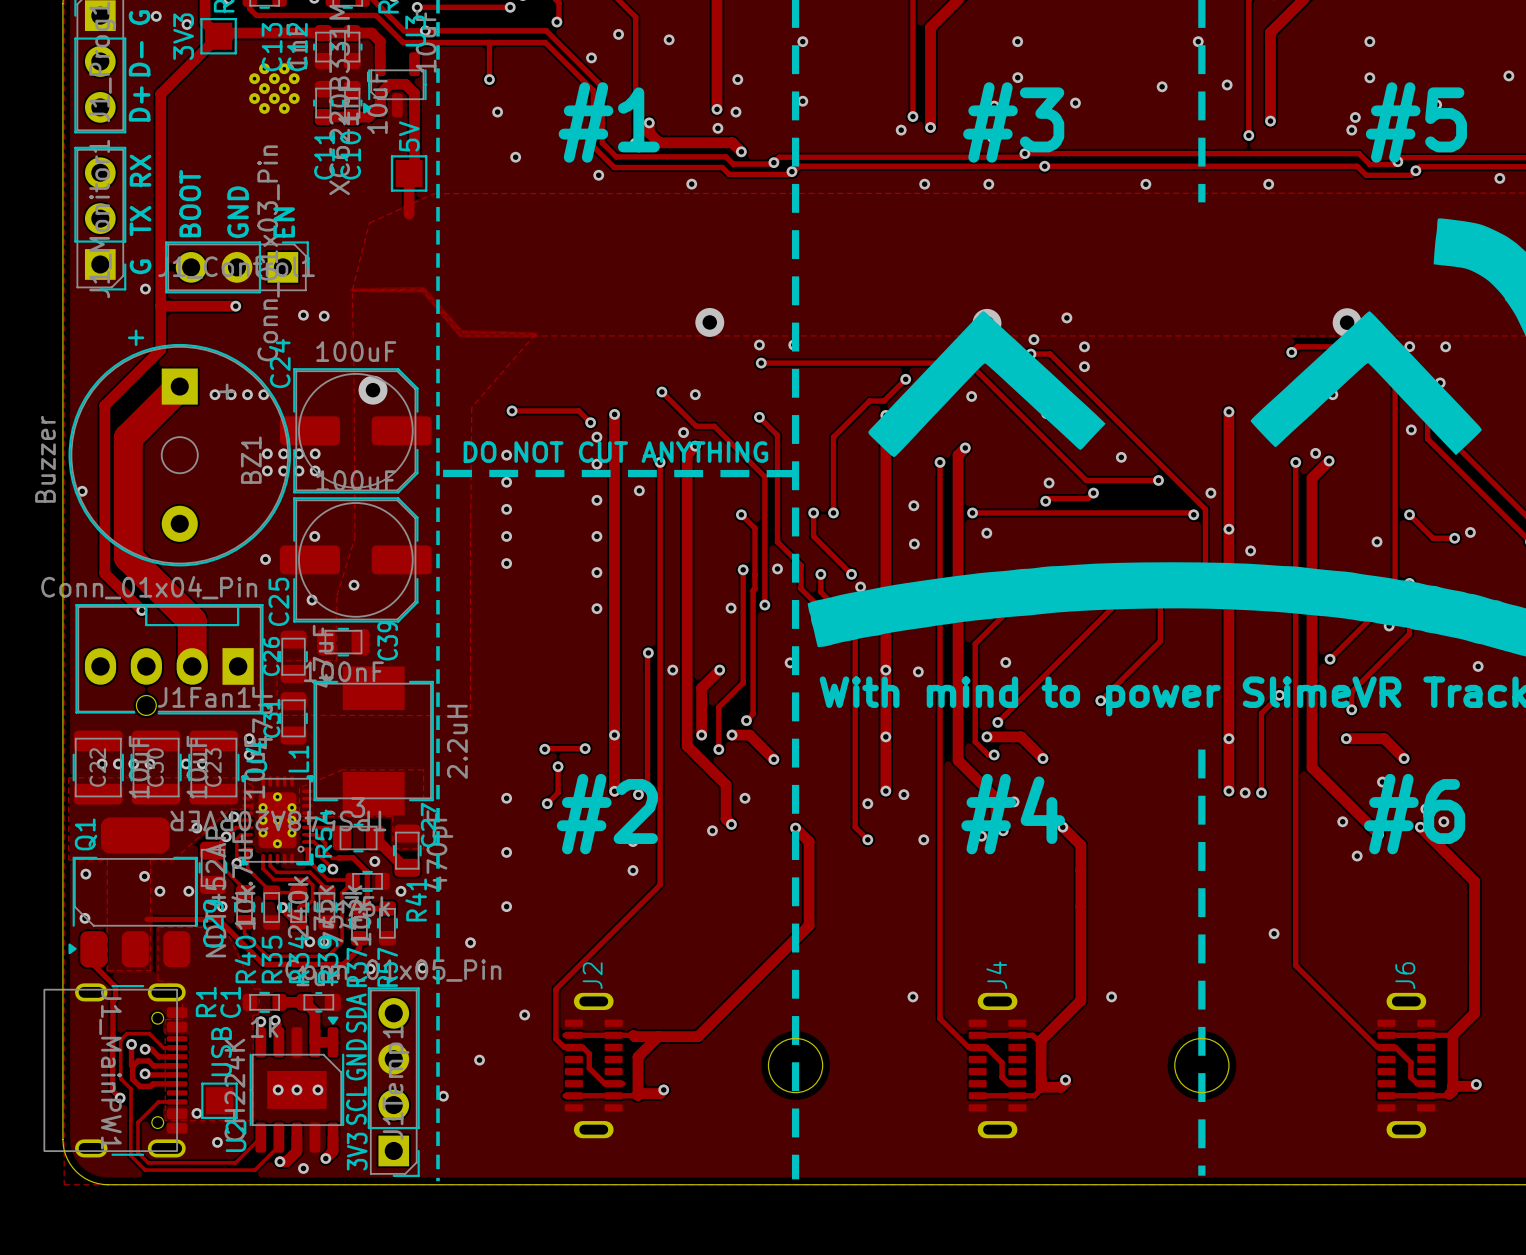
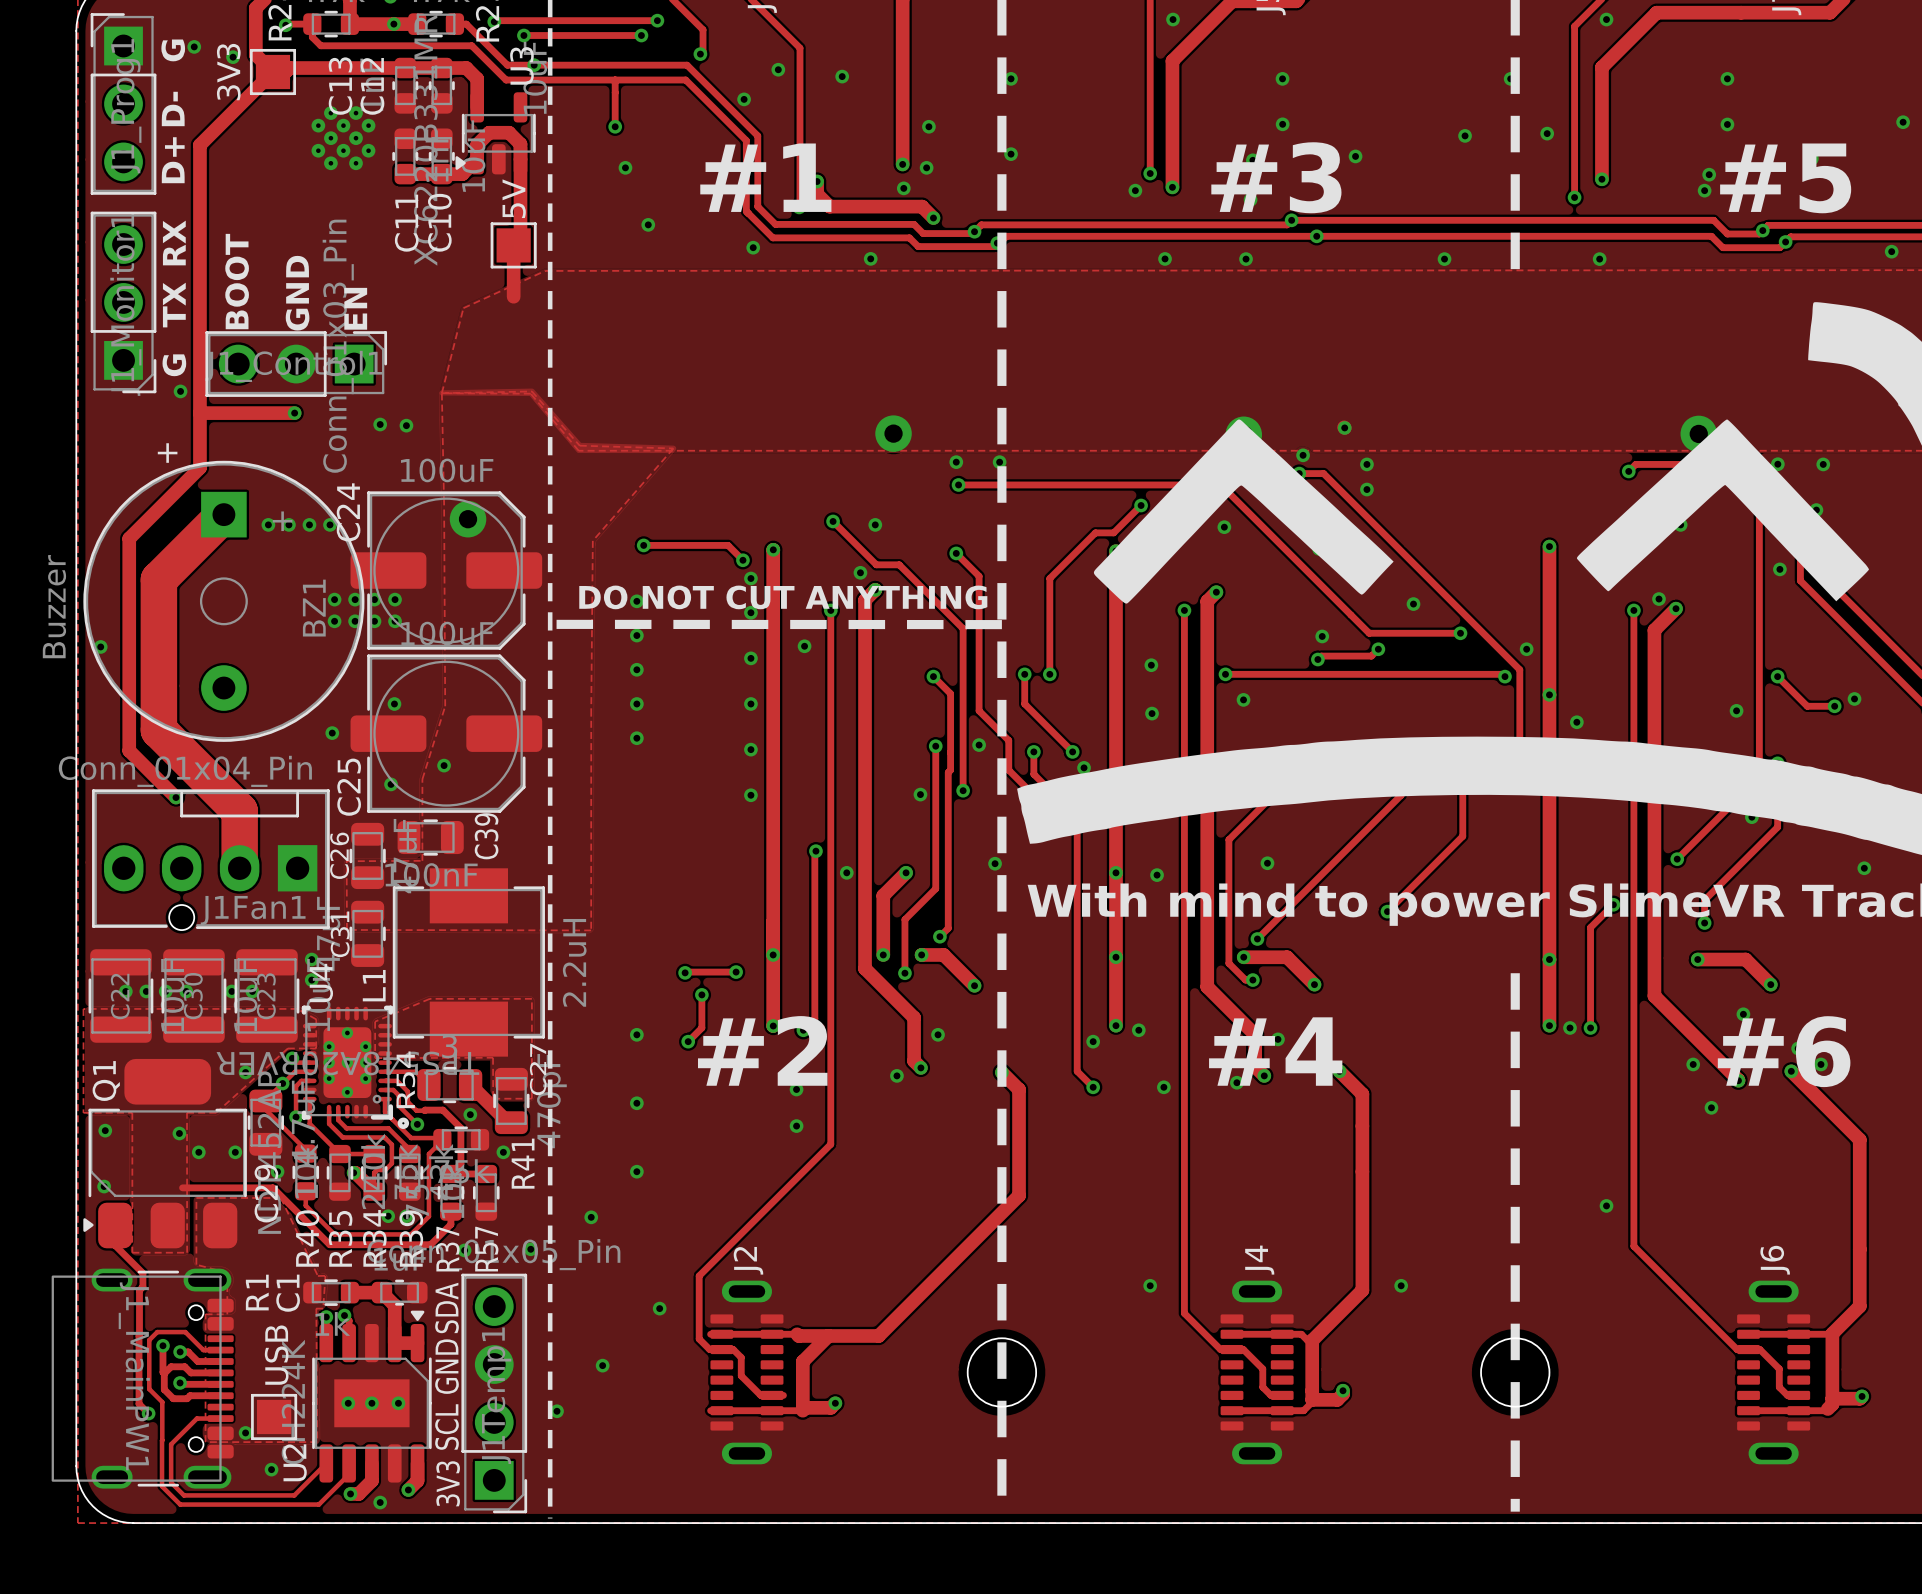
C24 name position: C24 (279, 363) -> C24 (348, 512)

